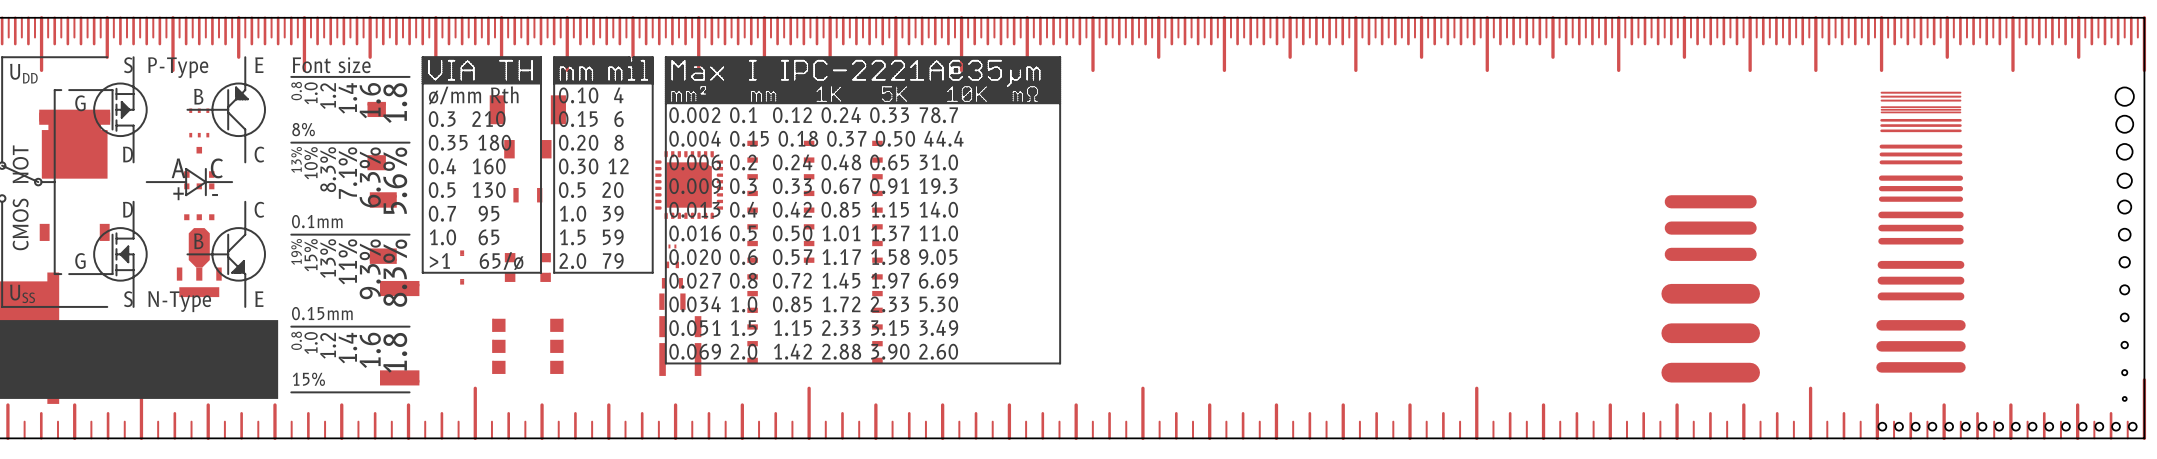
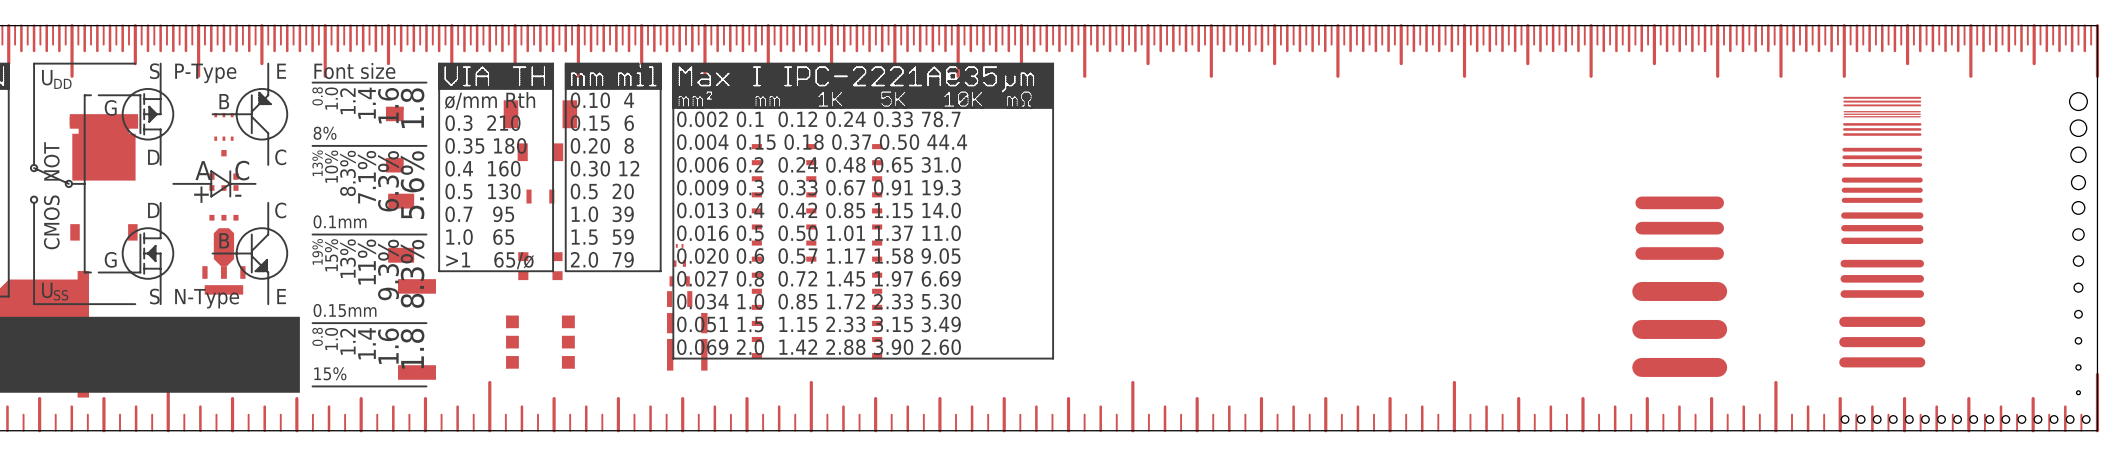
drawing: [655, 151, 724, 219] -> none
part: (462, 267) -> none

